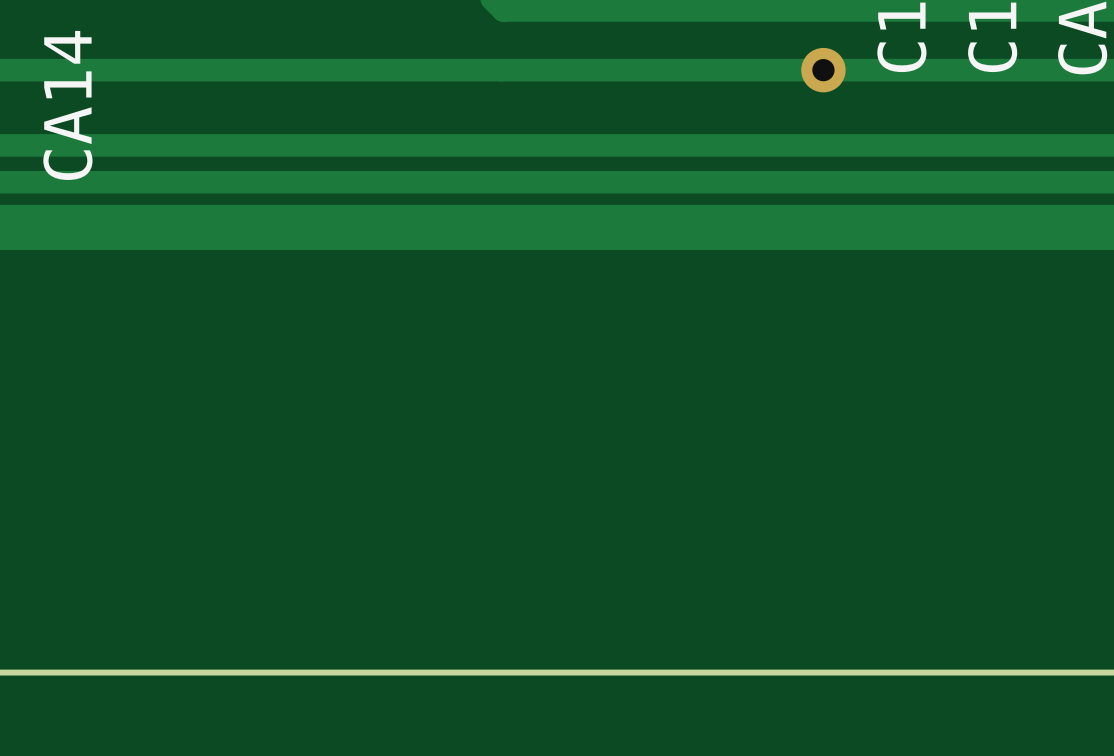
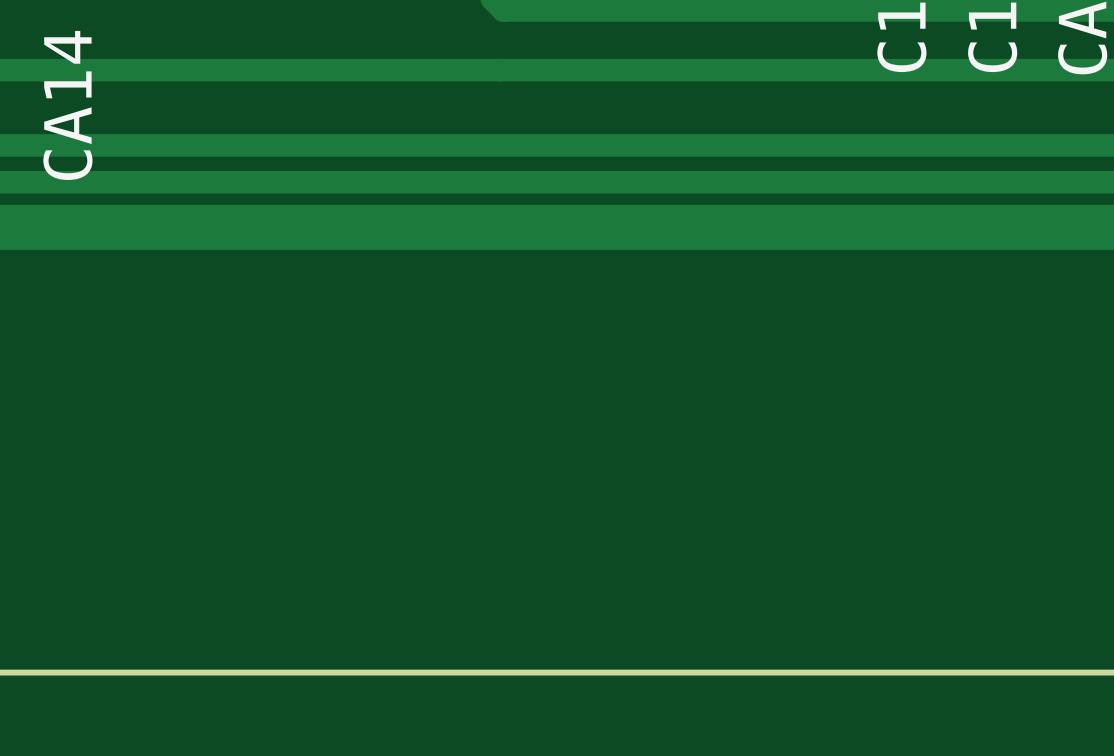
via: (823, 70) -> none

